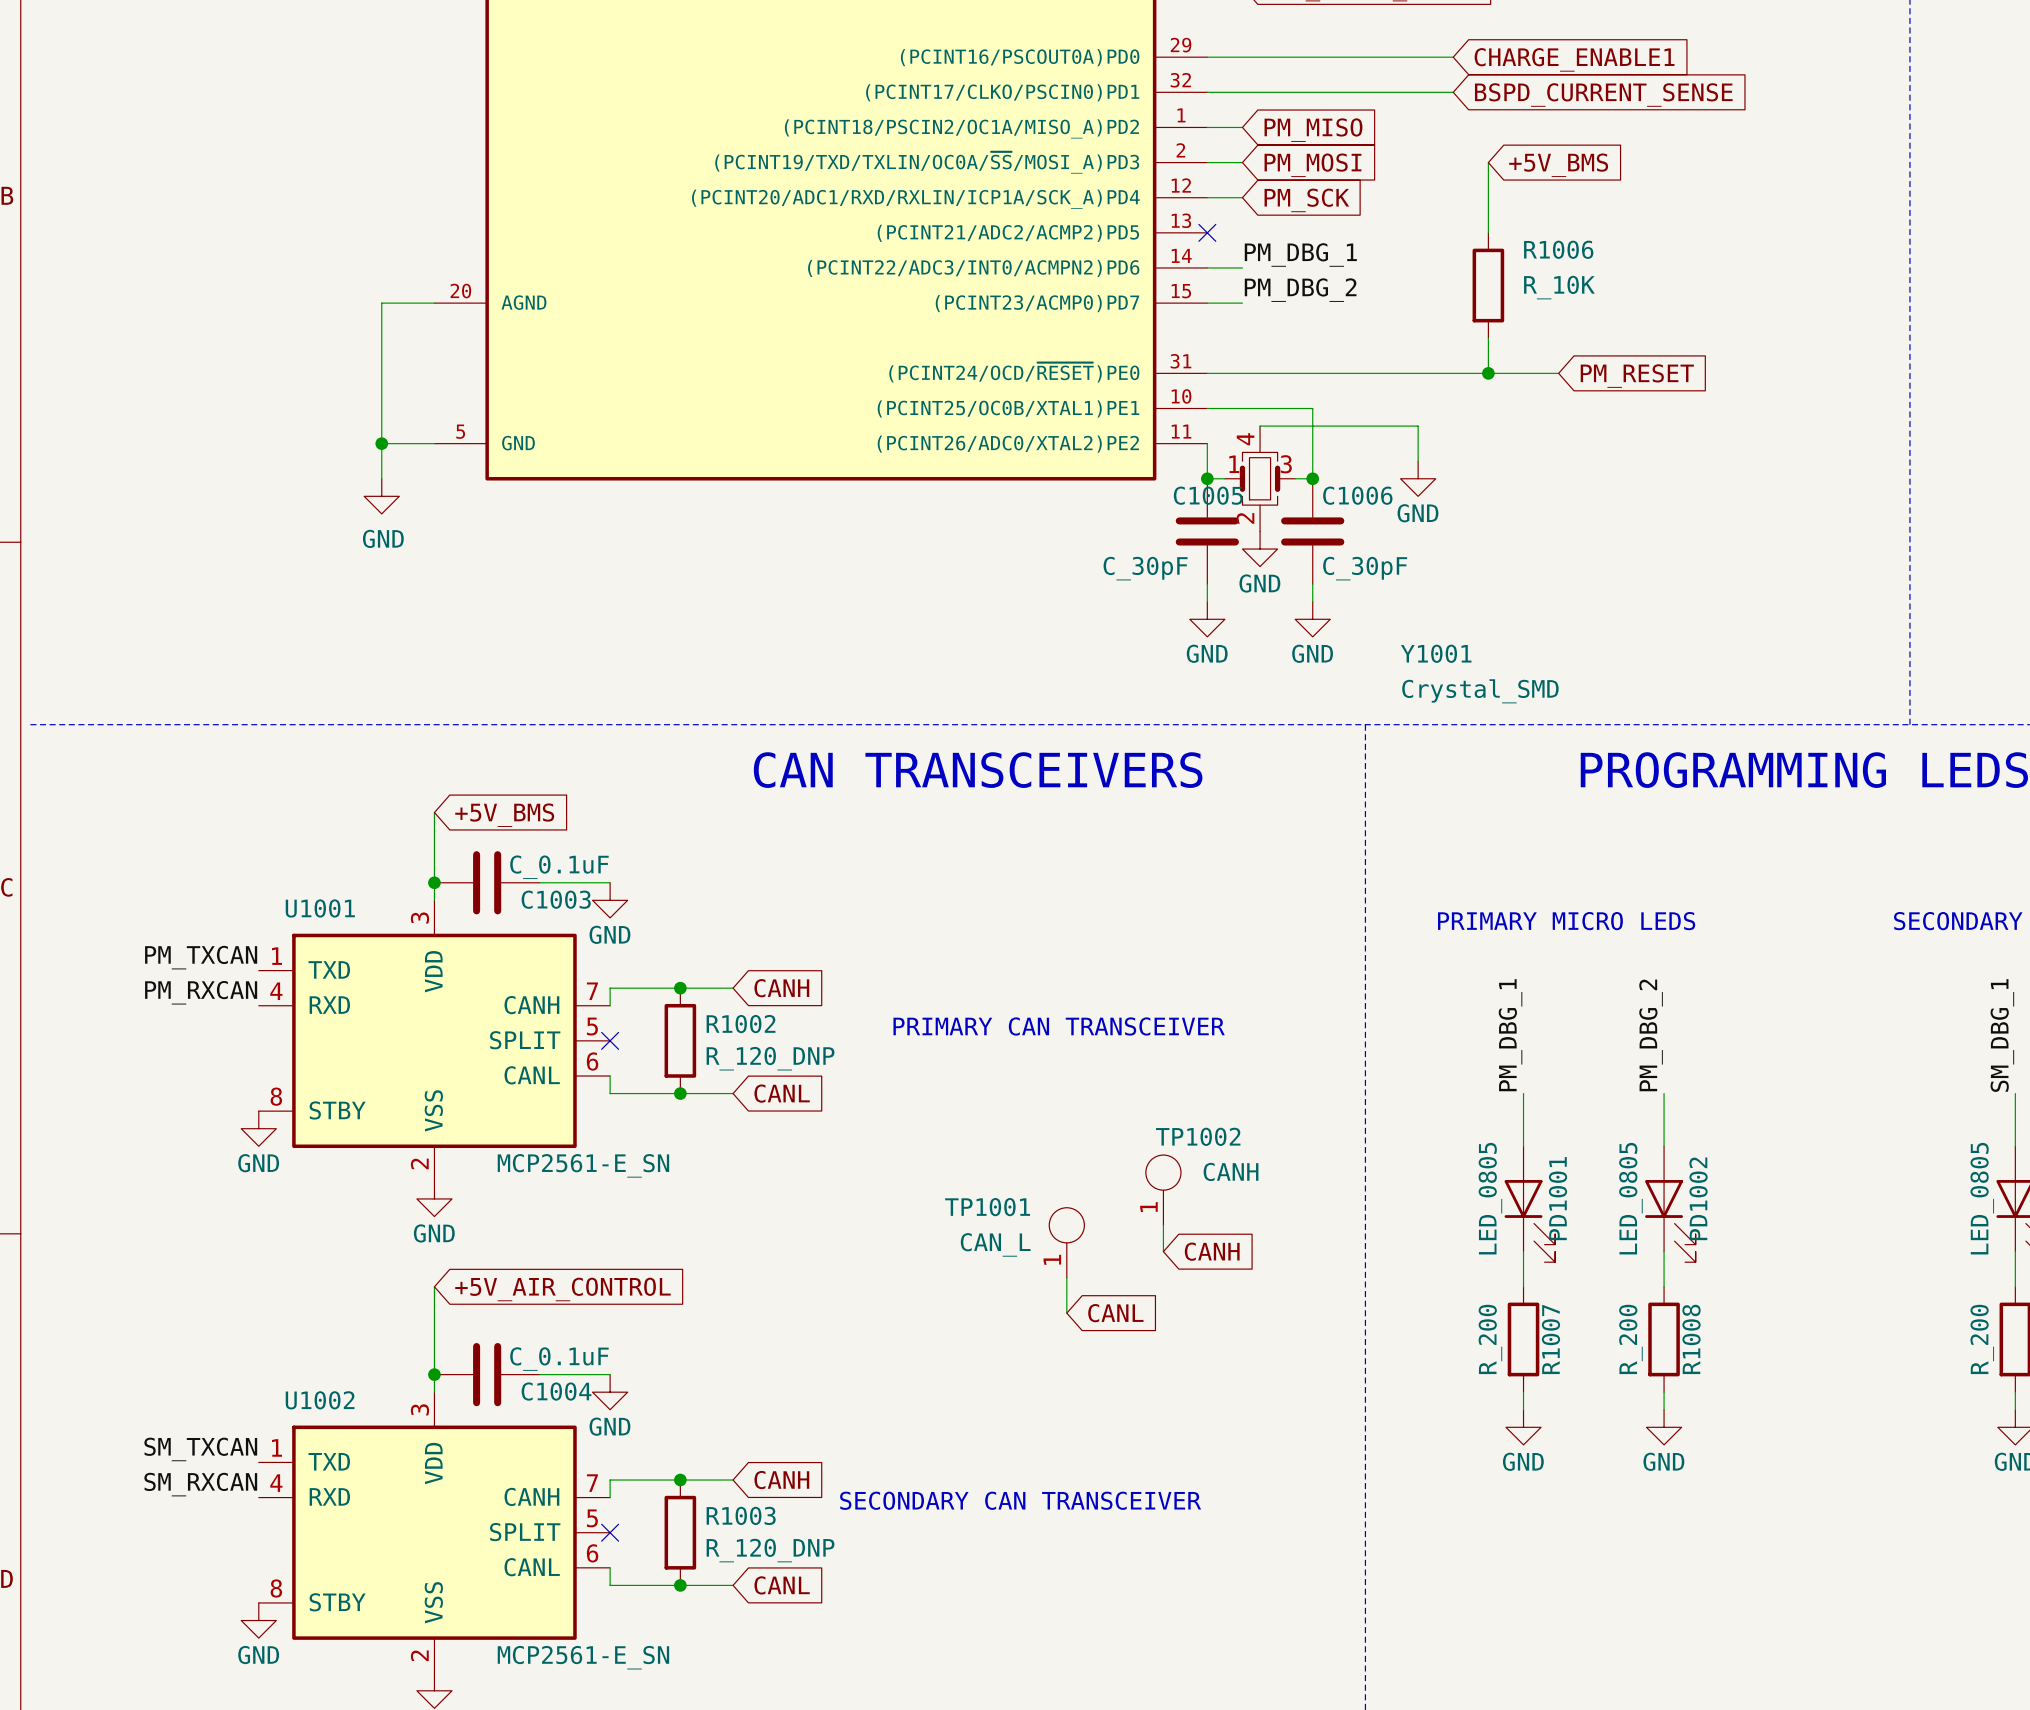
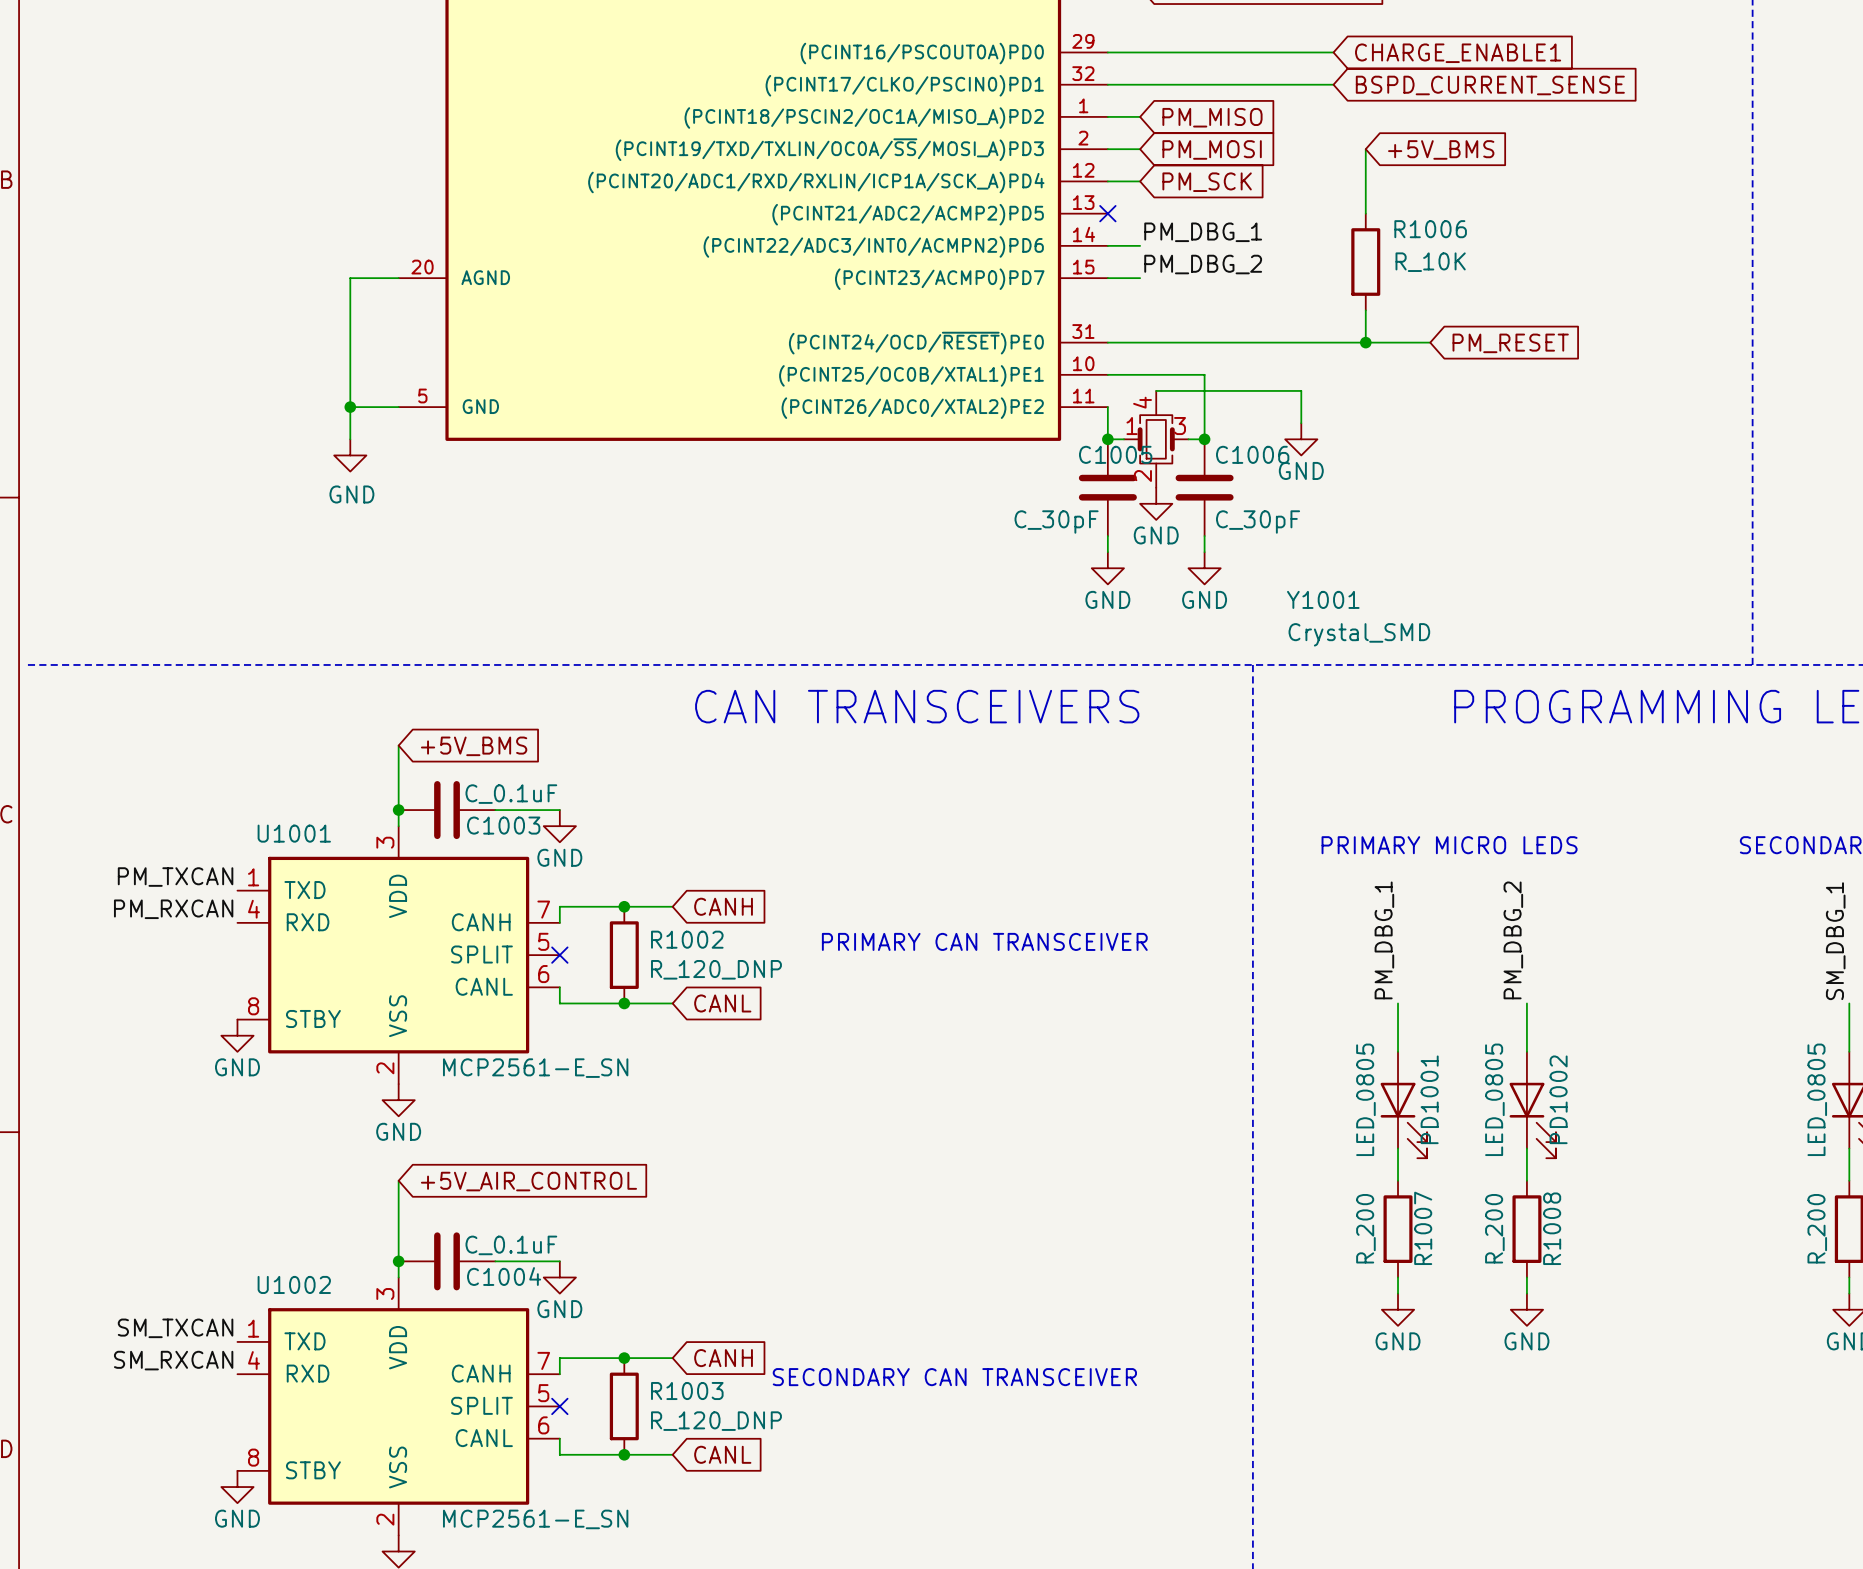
TP1002: CANH (1163, 1190) -> none
wire: (1163, 1225) (1163, 1251) -> none
TP1001: CAN_L (1066, 1242) -> none
global label: CANH (1212, 1251) -> none
wire: (1066, 1278) (1066, 1313) -> none
global label: CANL (1115, 1313) -> none

